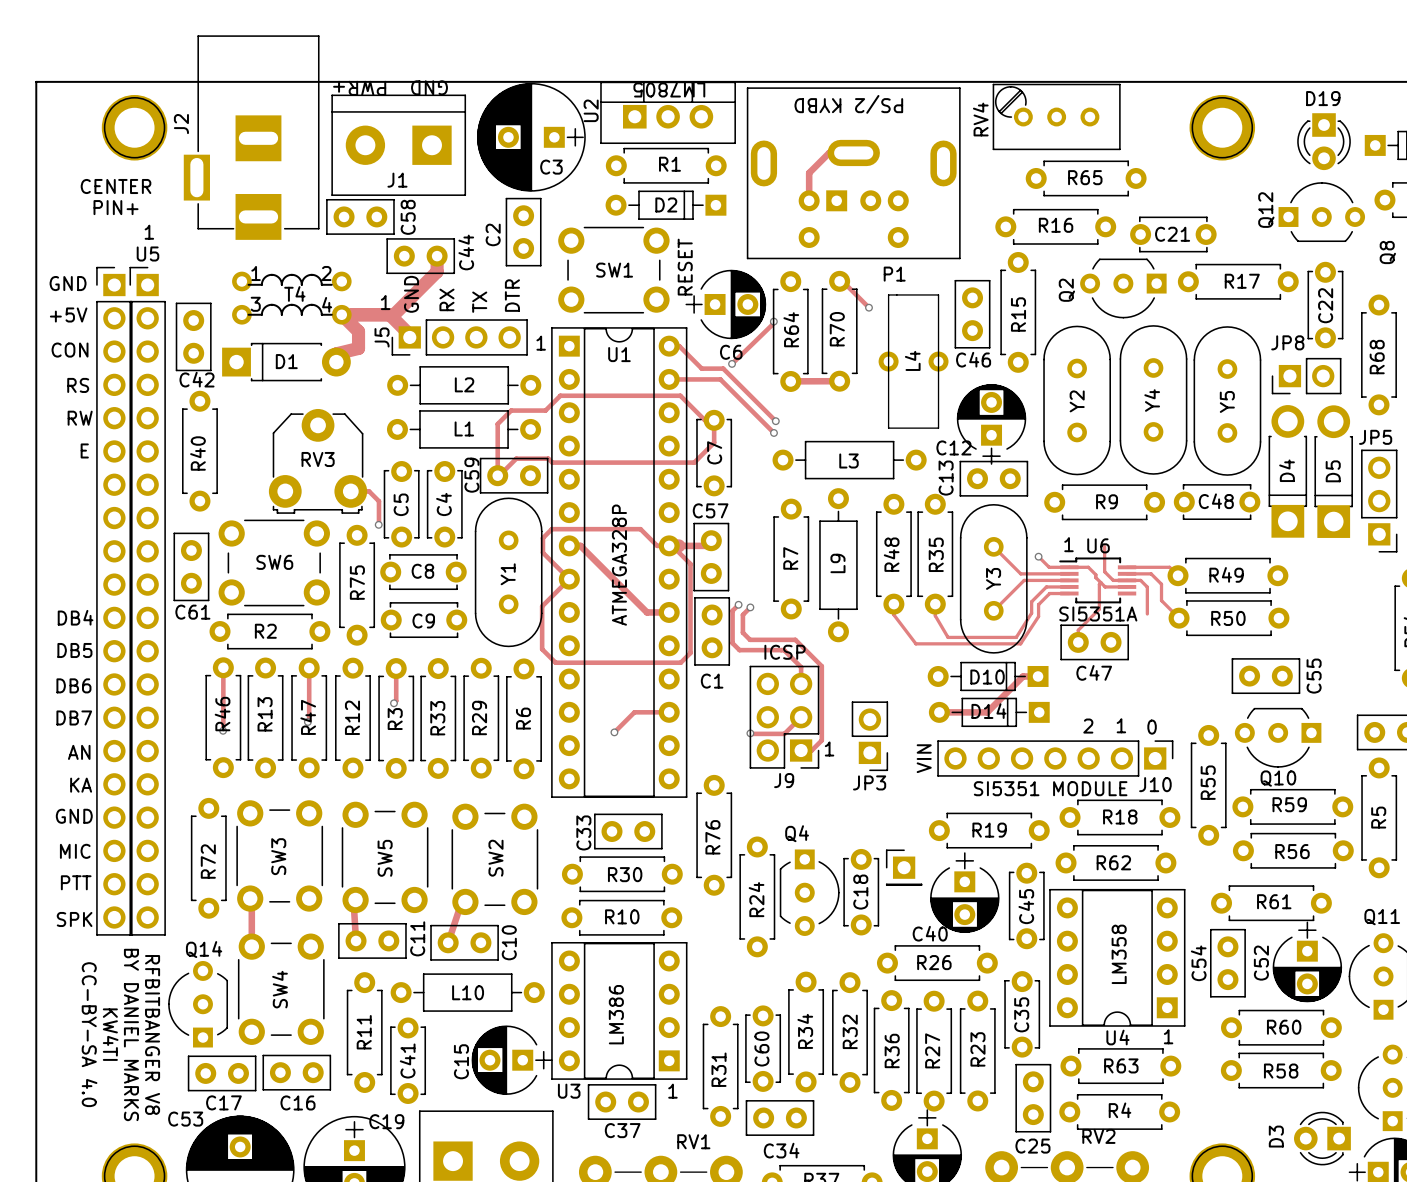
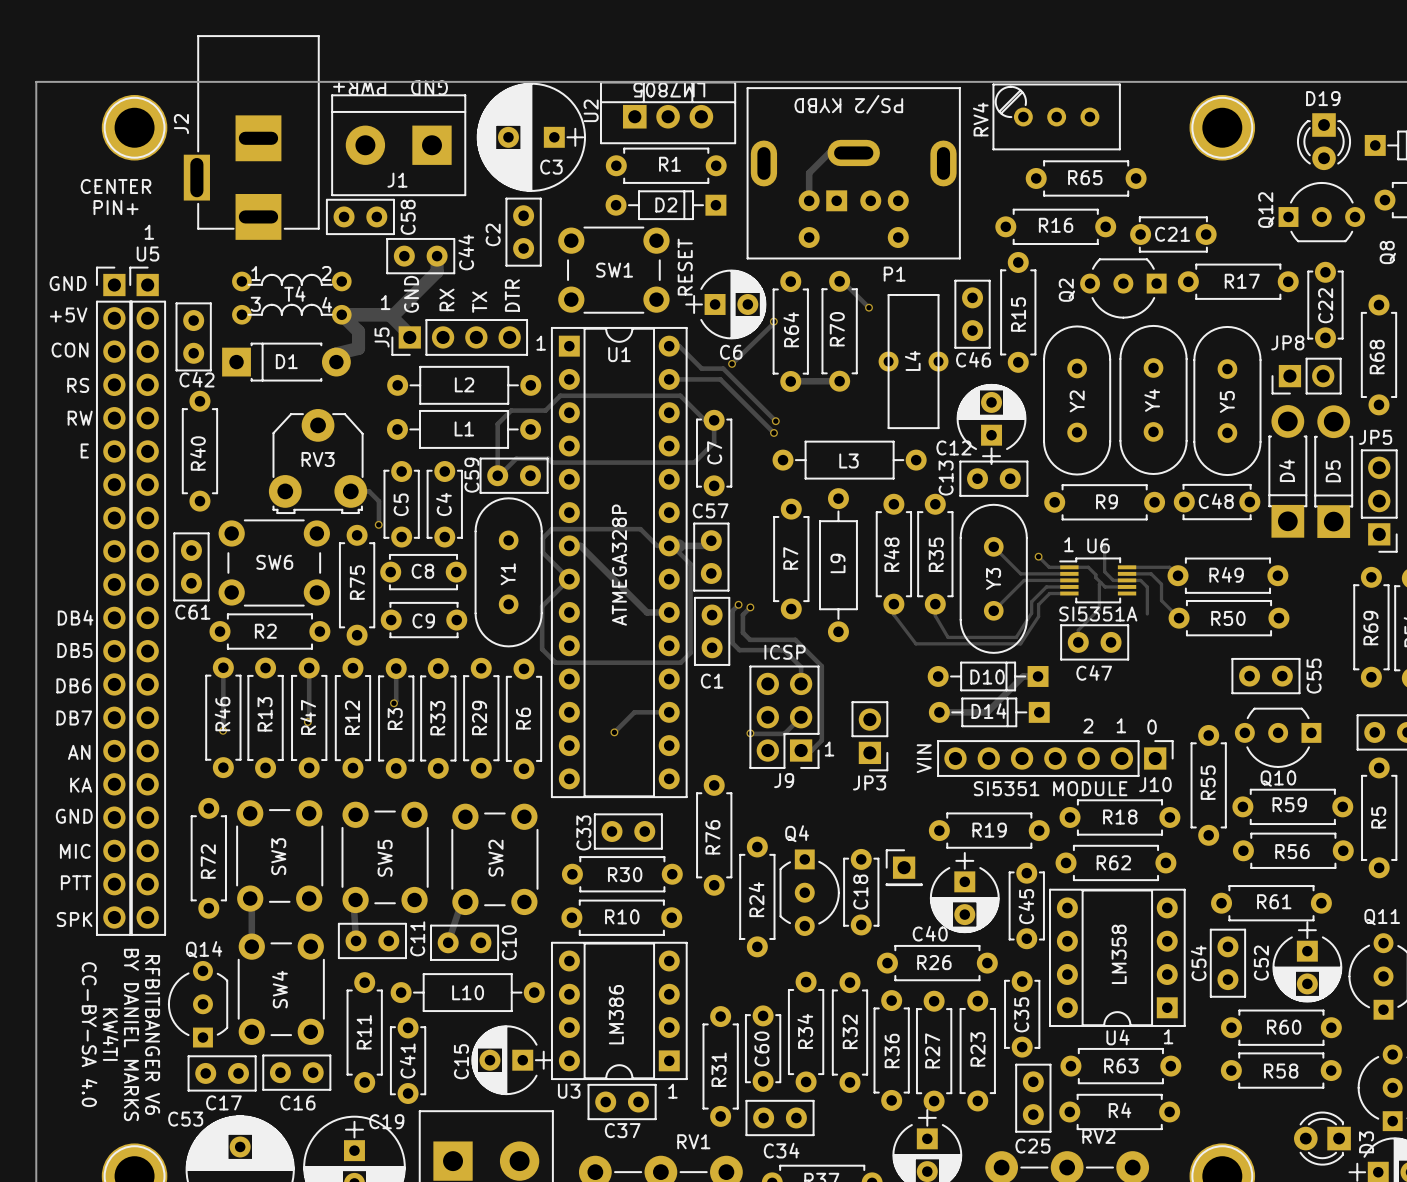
R69: none -> (1371, 627)
text: RFBITBANGER V8 (152, 1034) -> RFBITBANGER V6 (152, 1034)
D3 name position: D3 (1276, 1136) -> D3 (1366, 1142)

